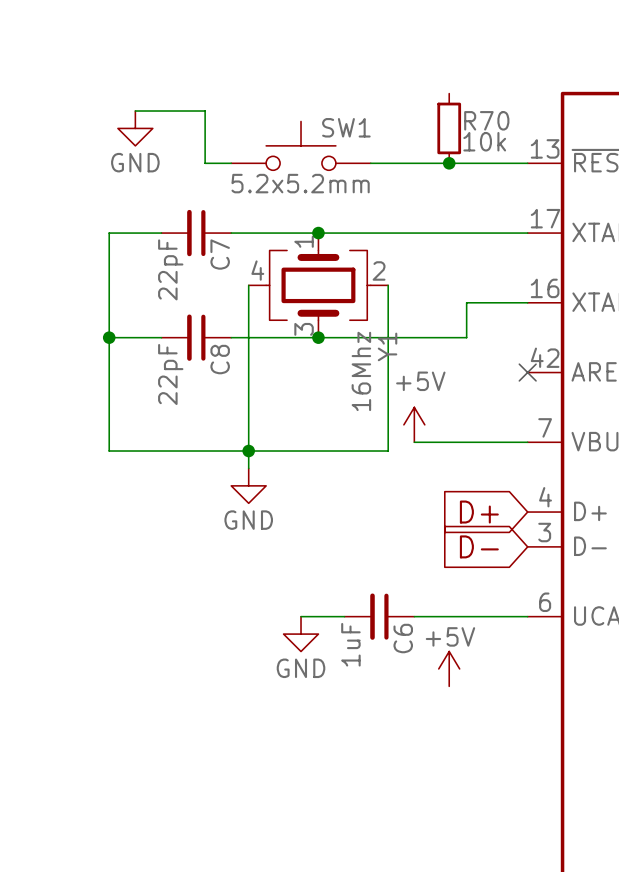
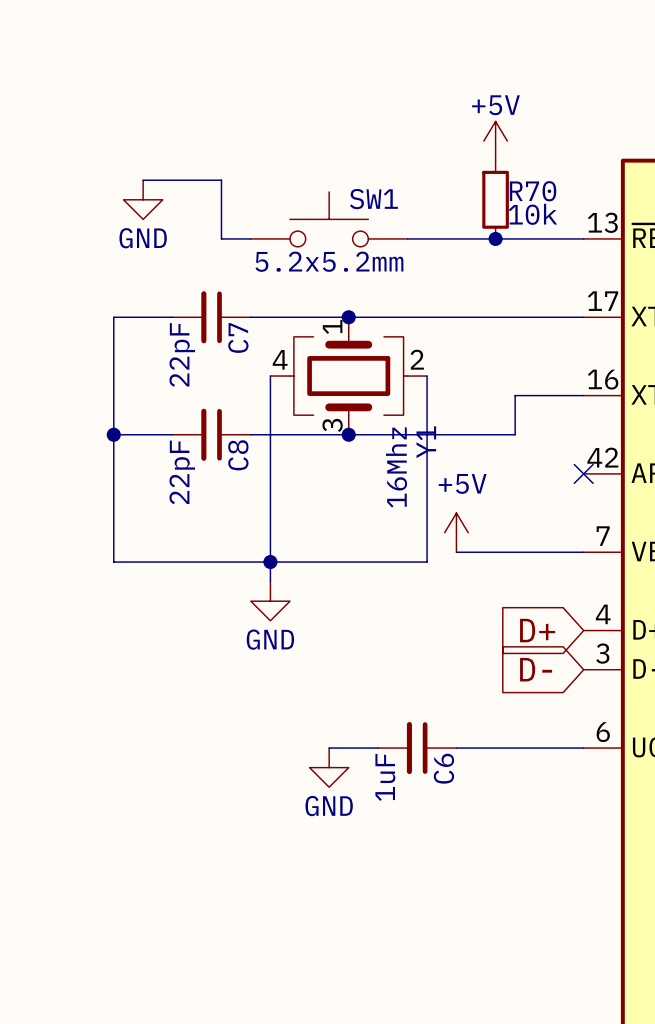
power symbol: none -> +5V (495, 141)
power symbol: +5V (449, 668) -> none

